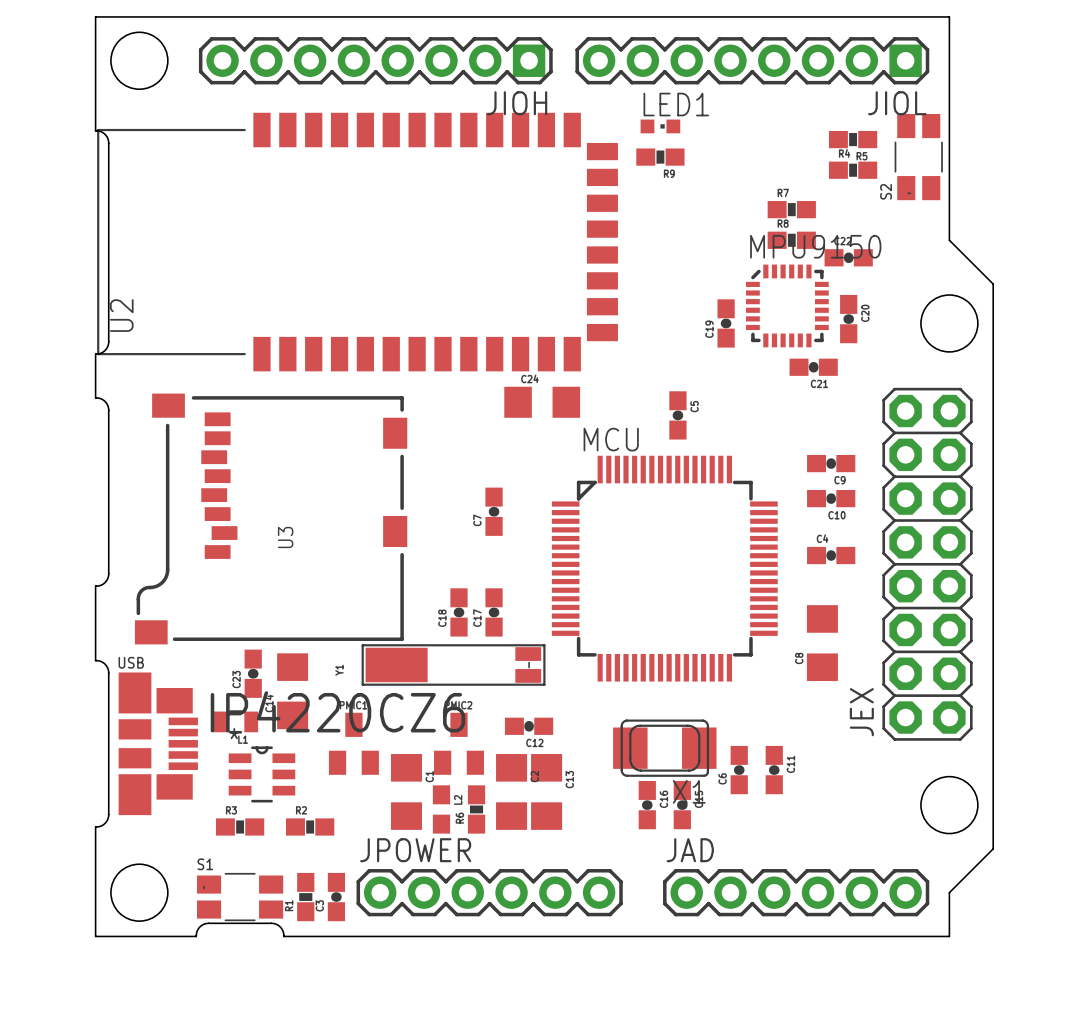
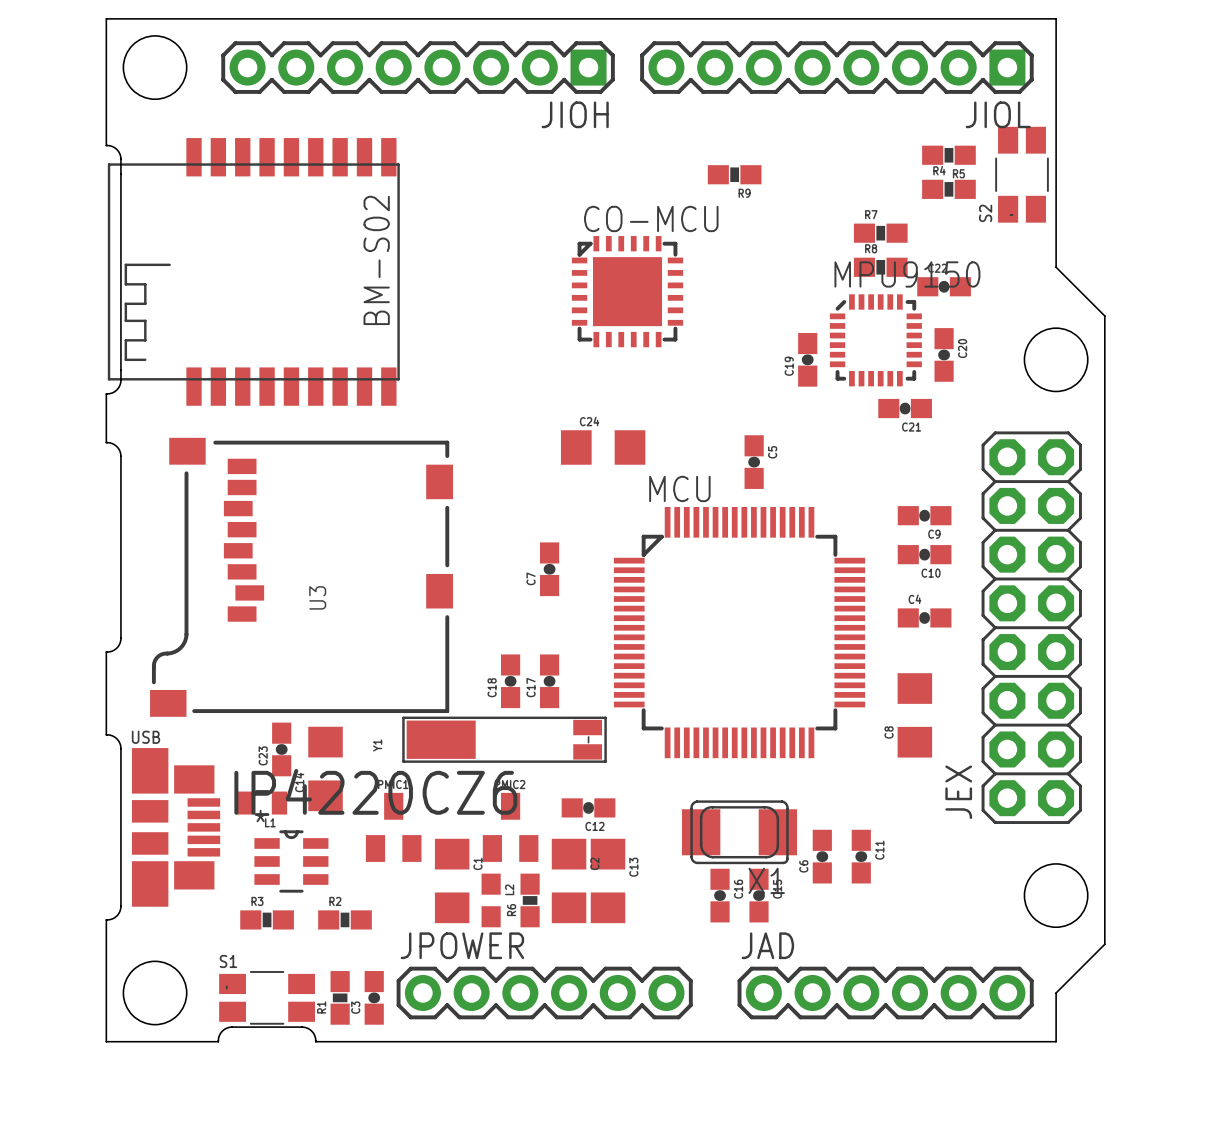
LED1: (660, 126) -> none
U2: (357, 242) -> none
part: none -> (253, 271)
CO-MCU: none -> (627, 291)

